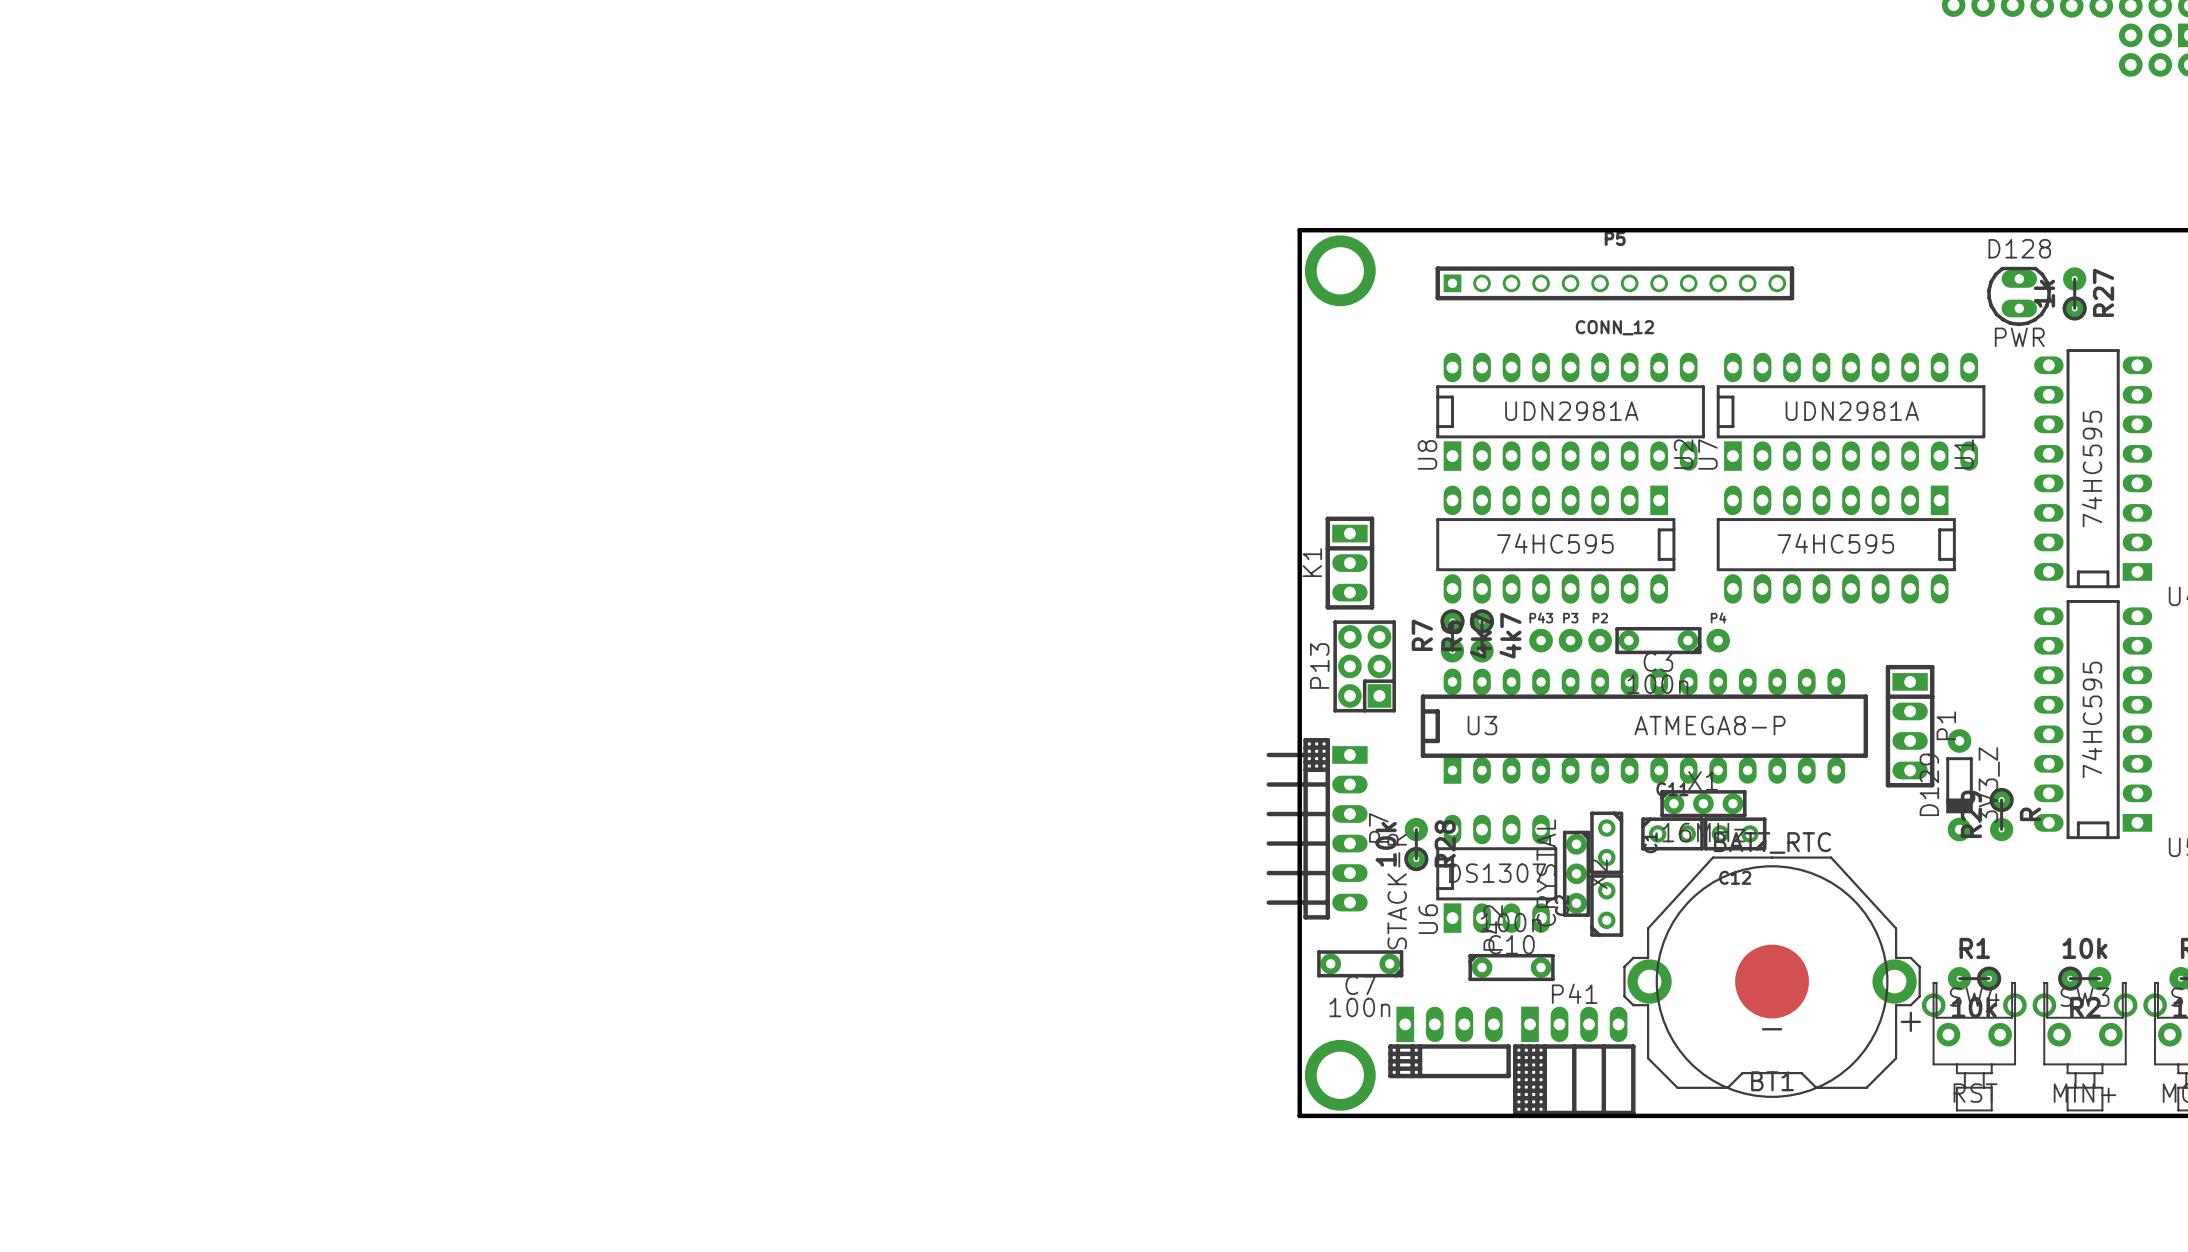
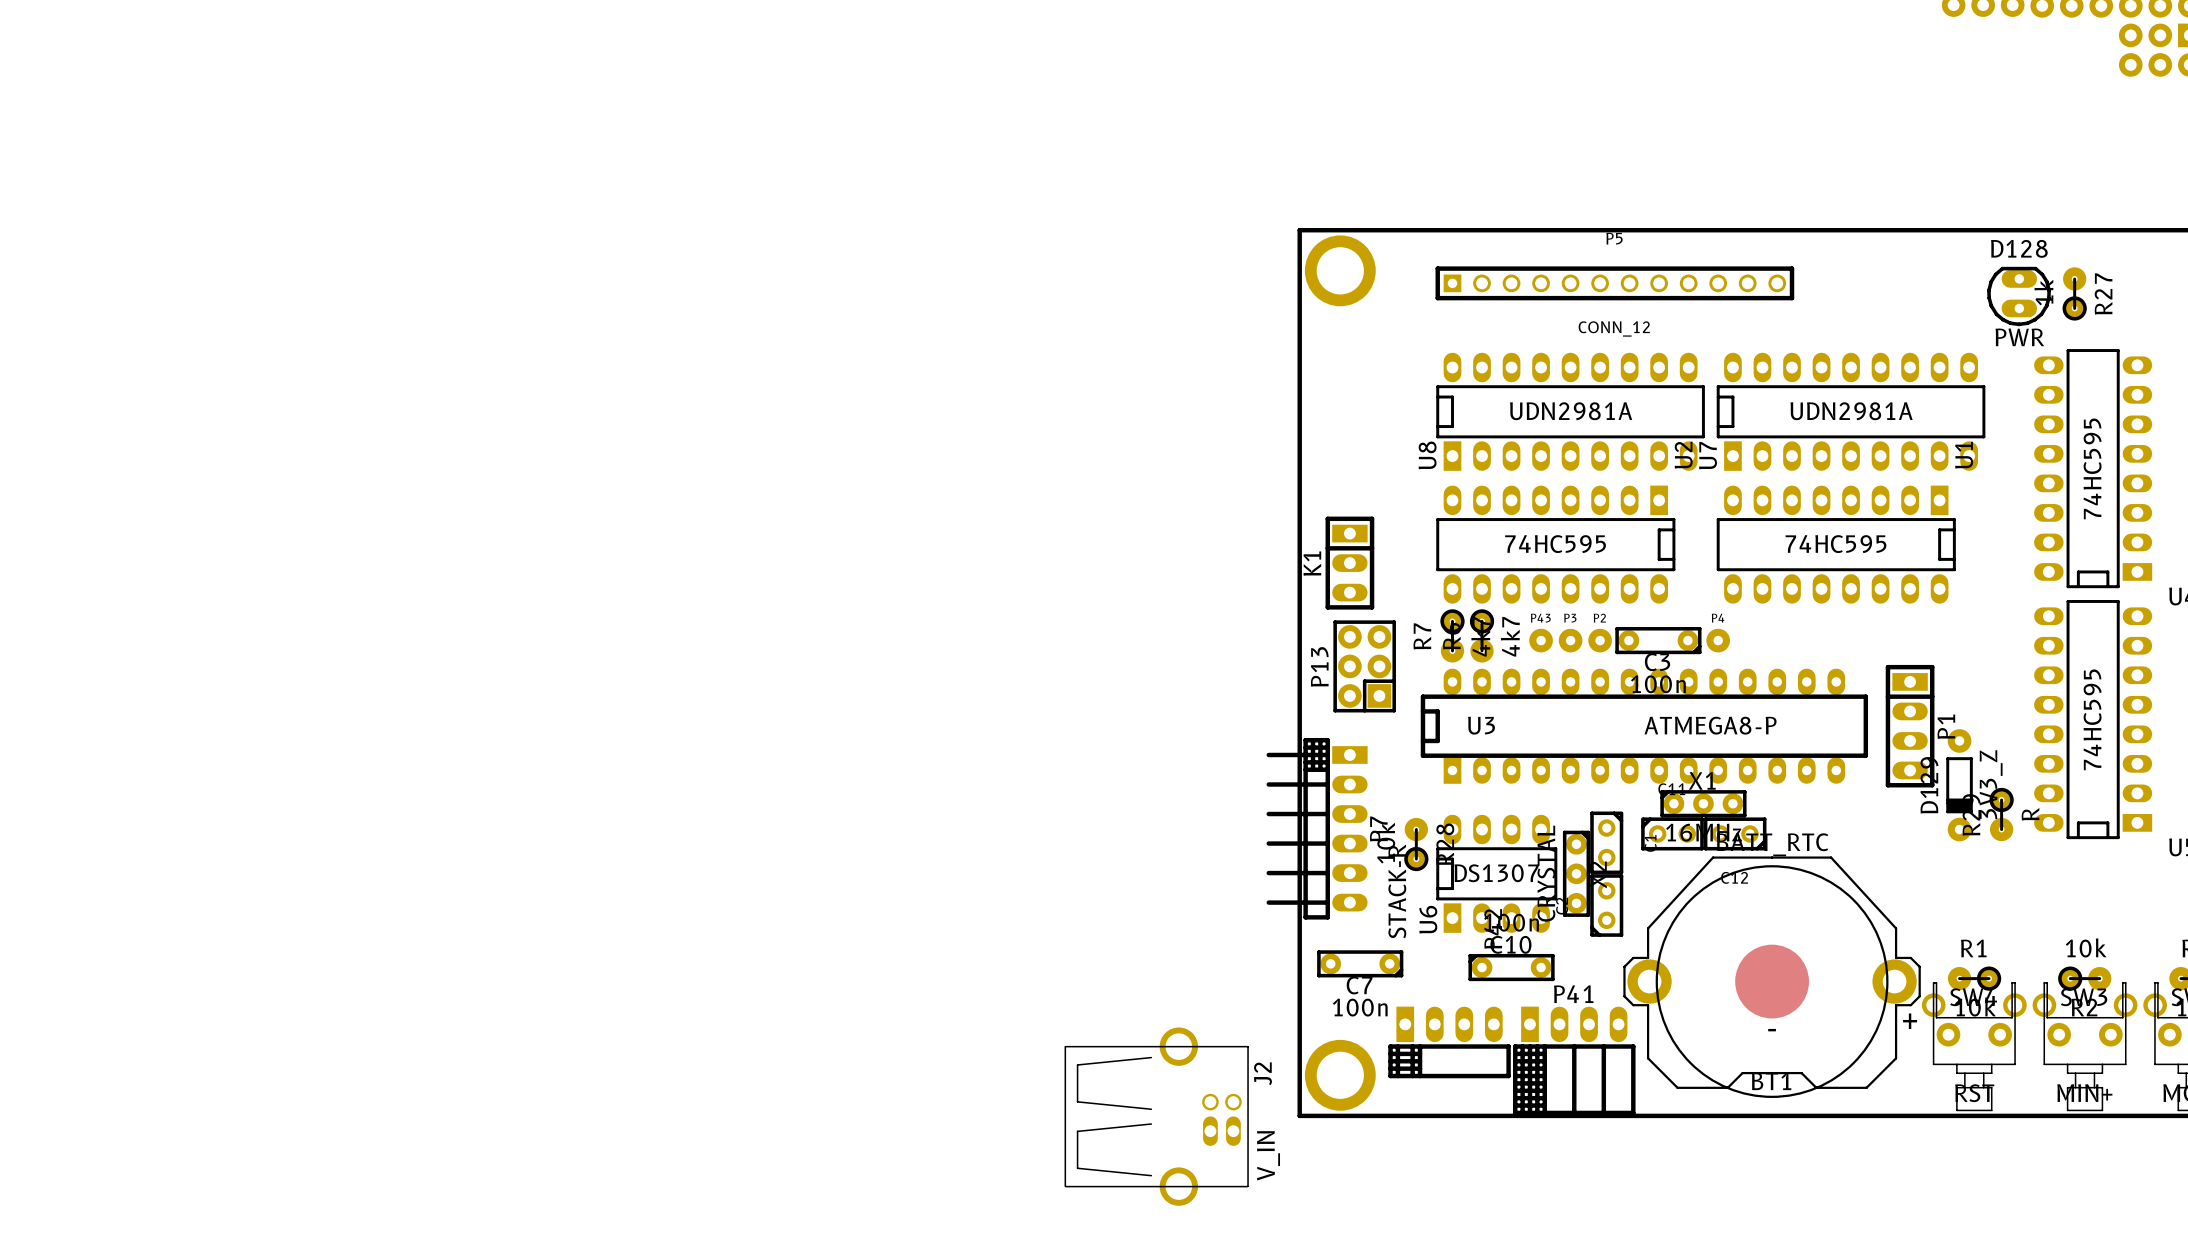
J2: none -> V_IN (1156, 1116)

